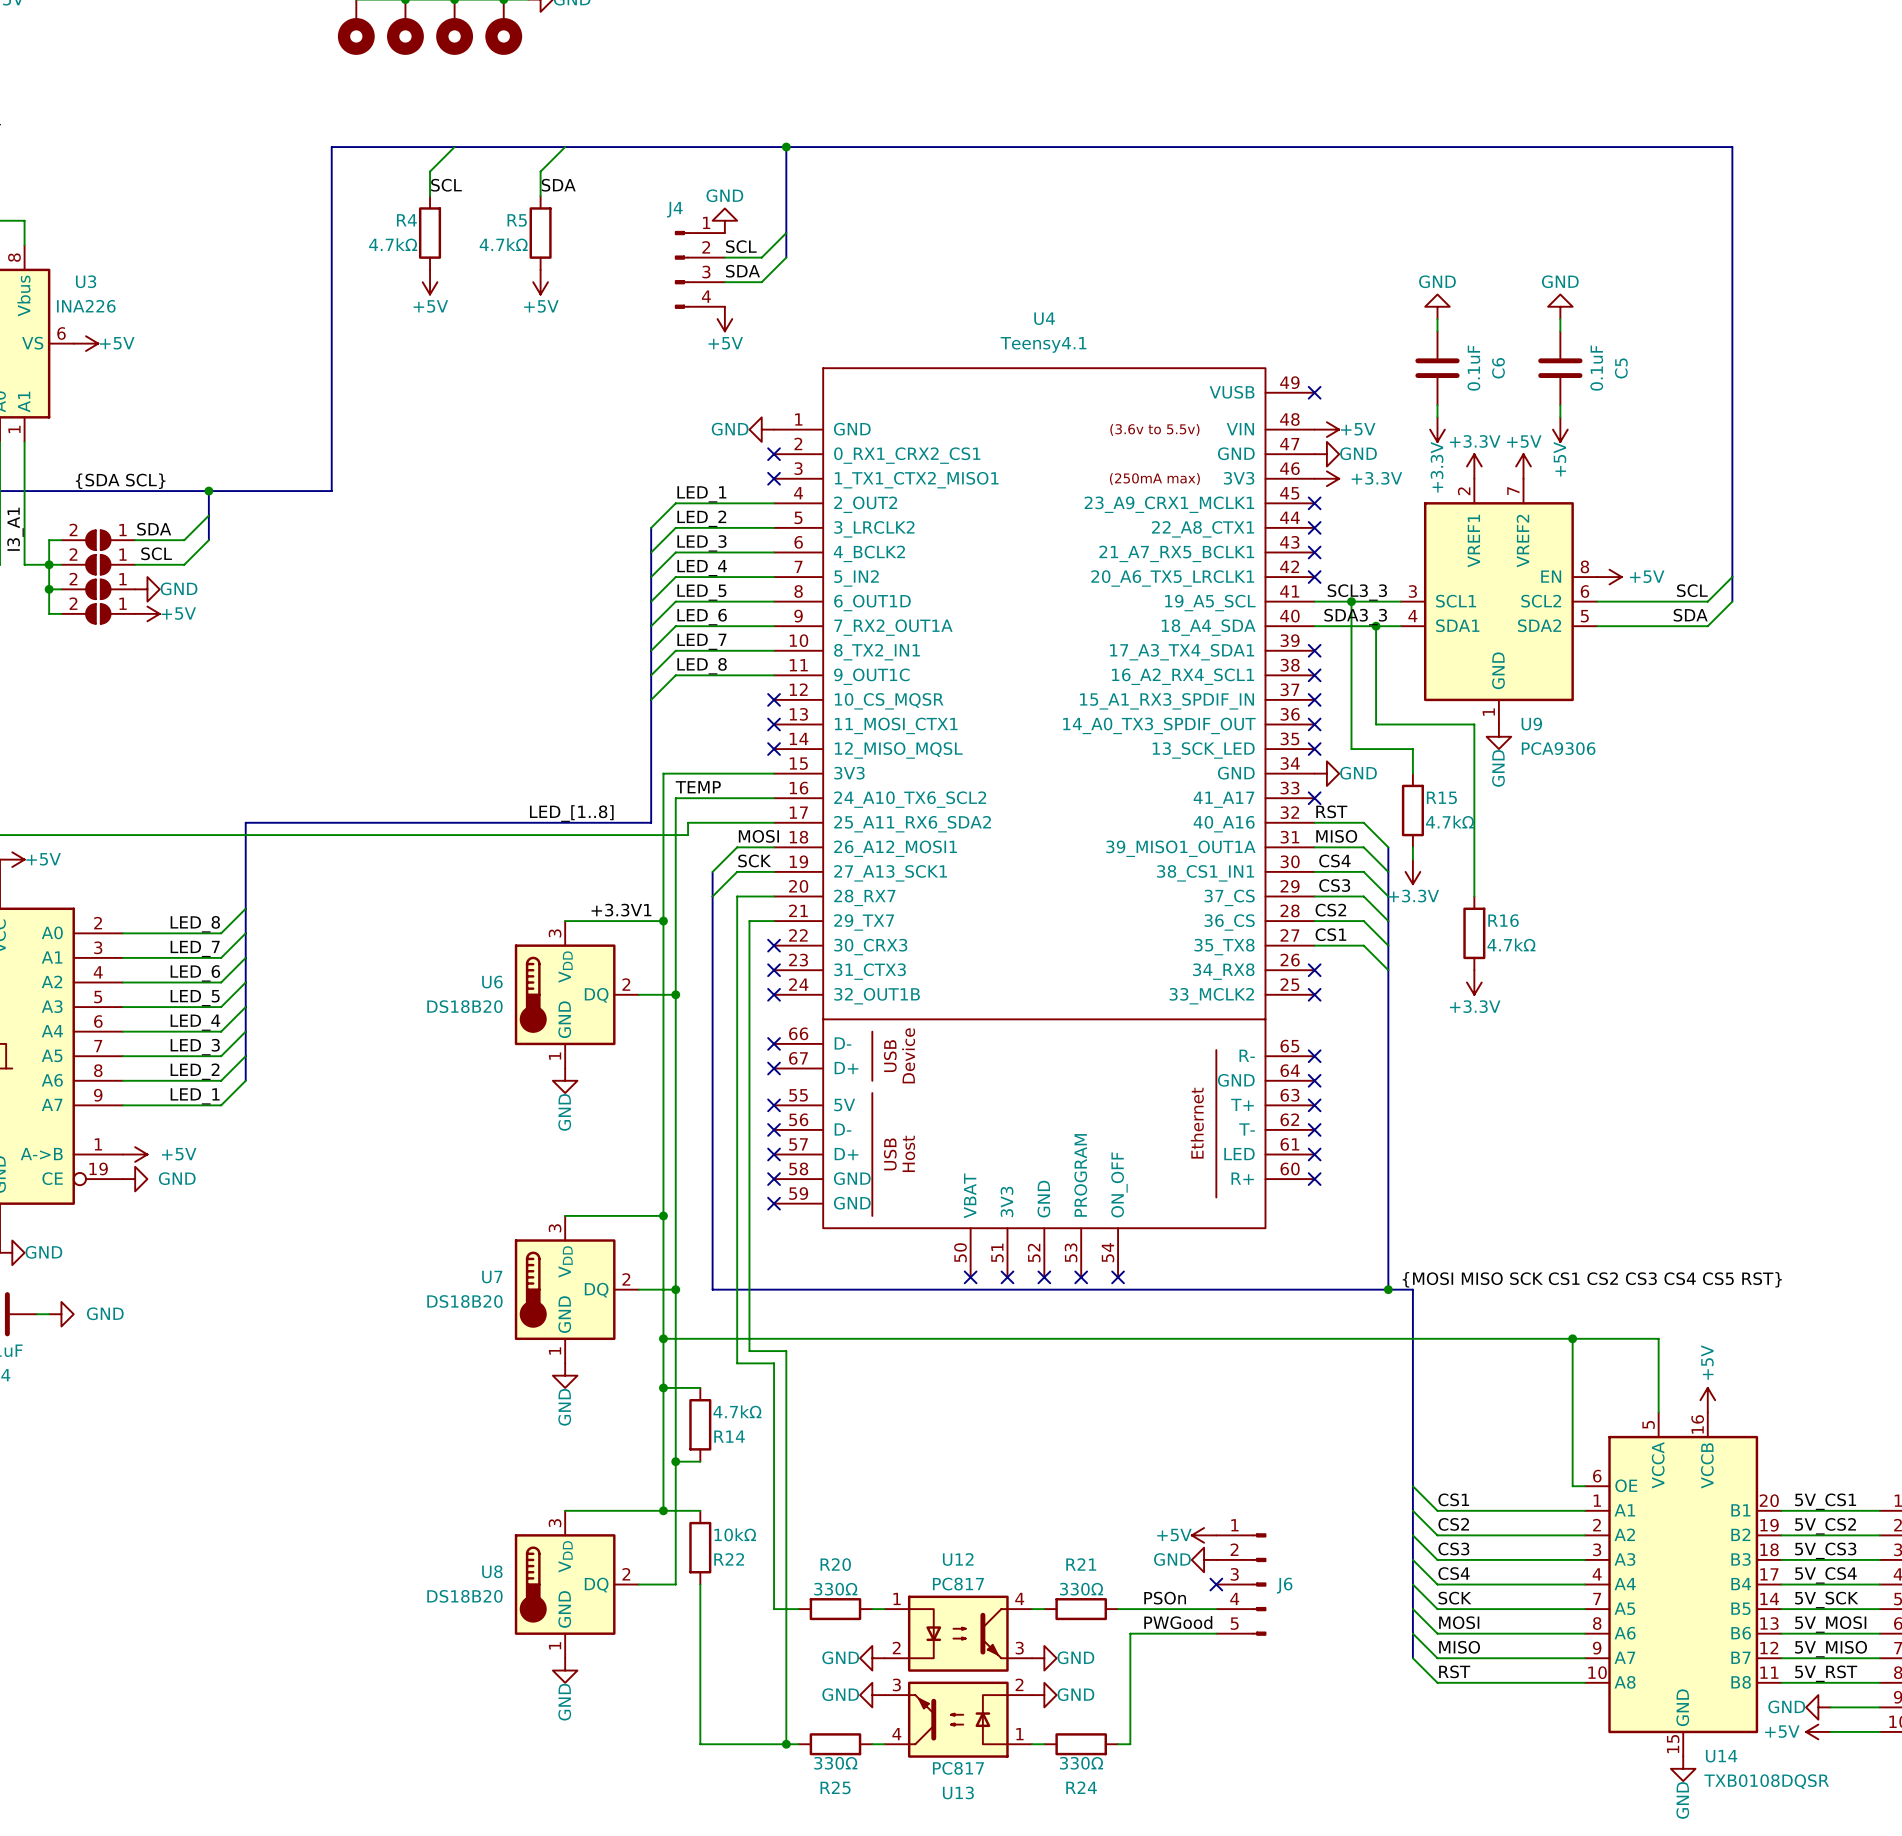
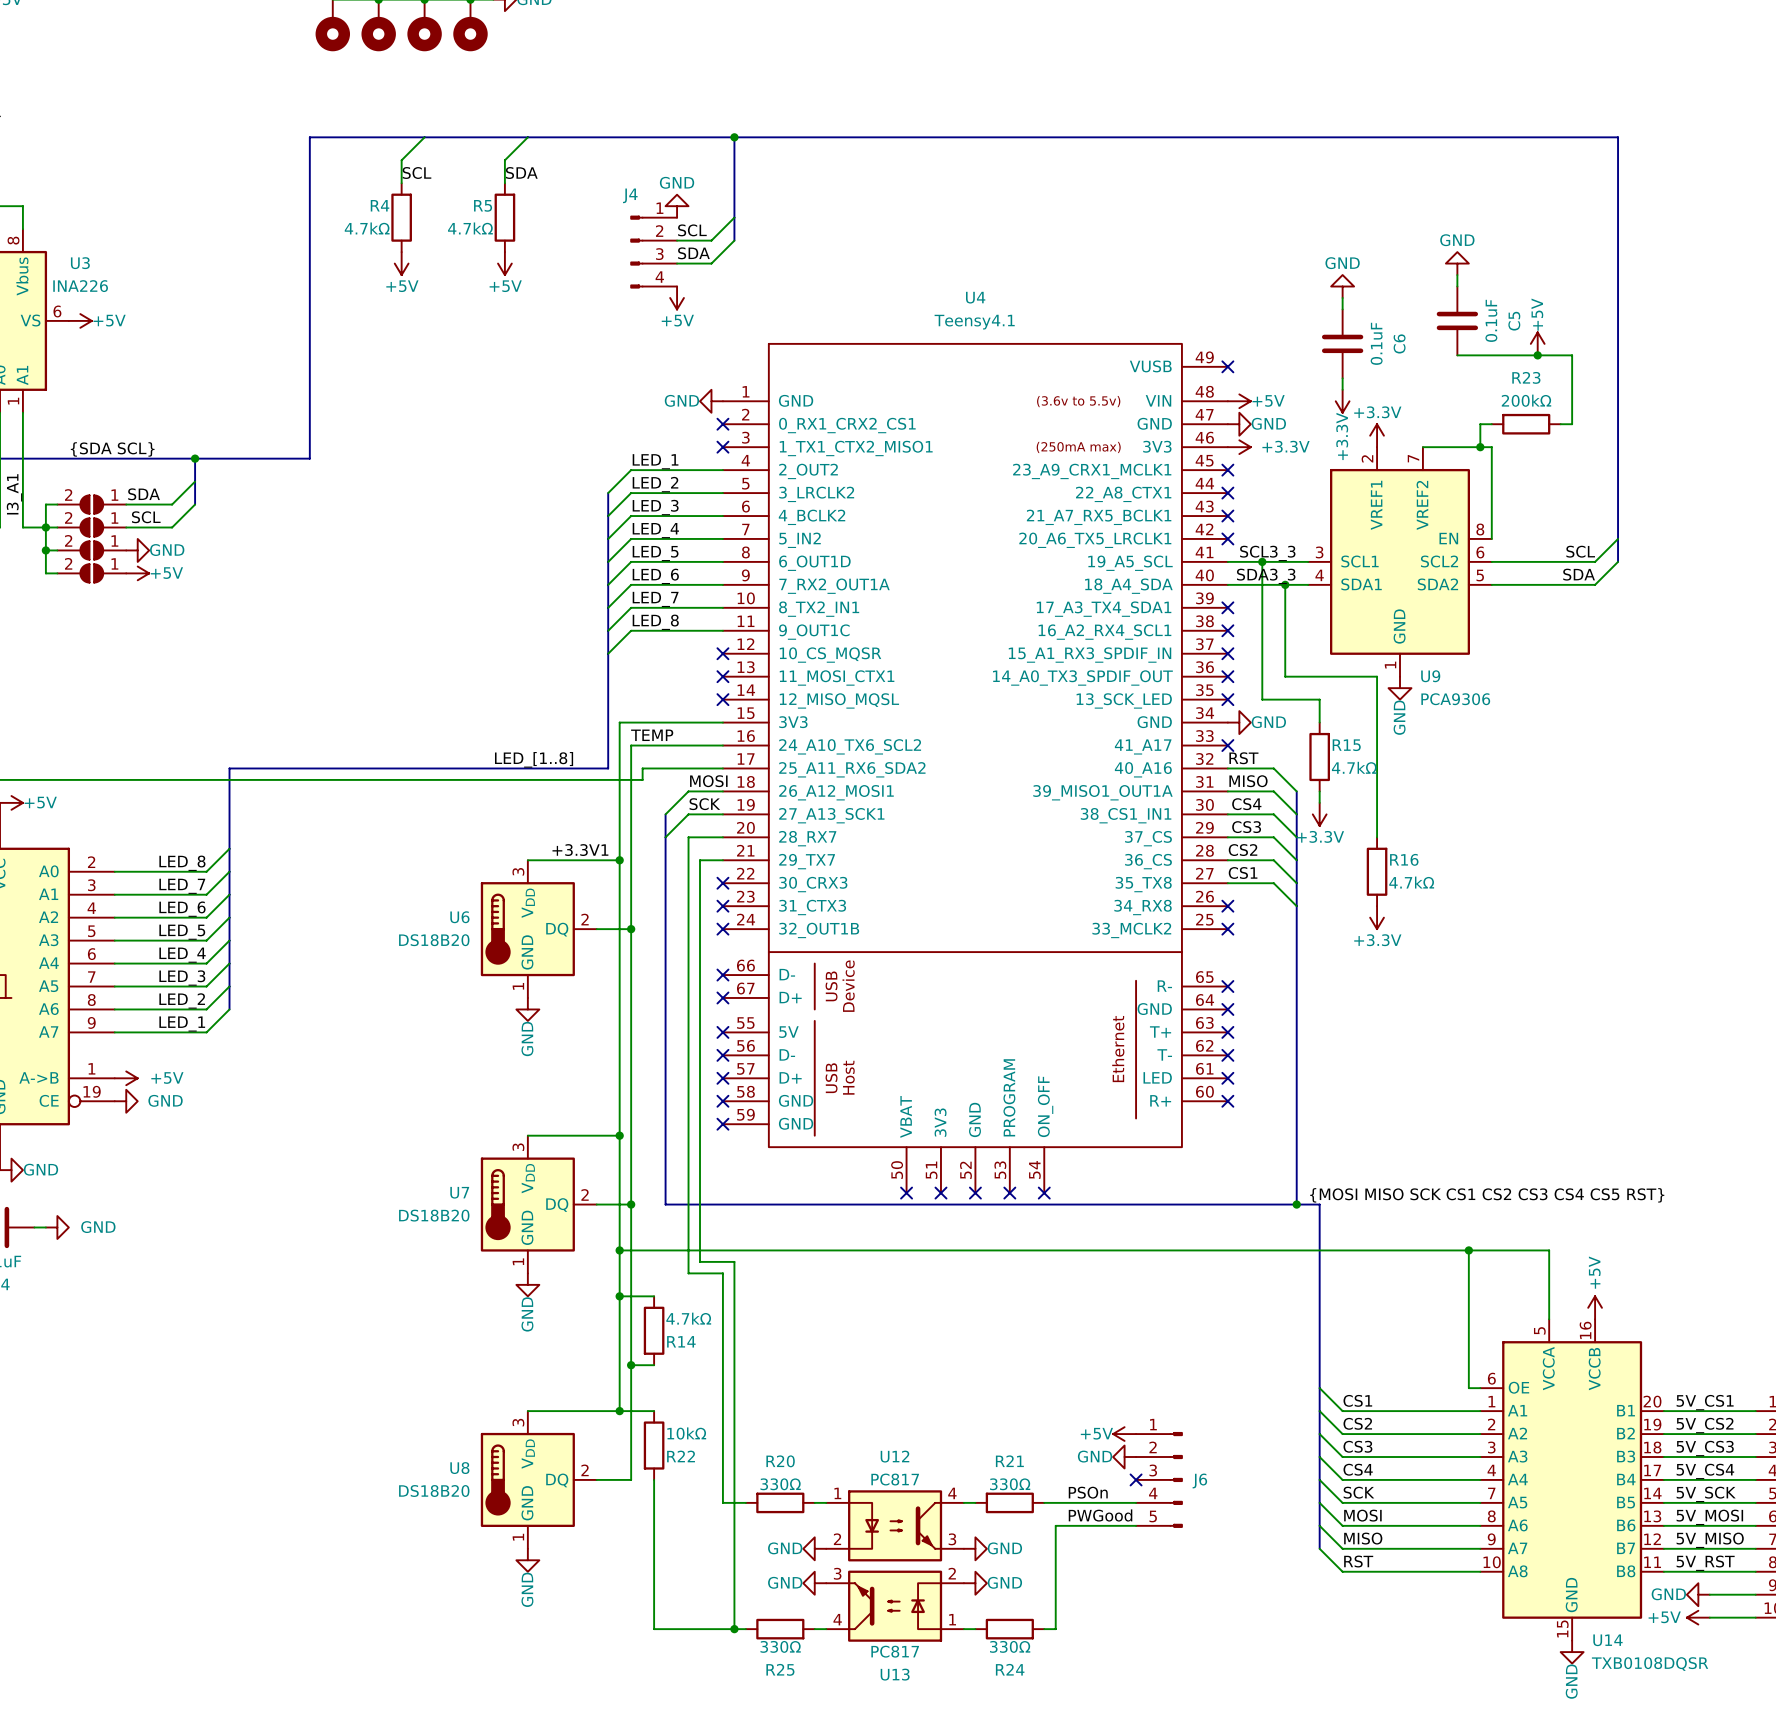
power symbol position: GND (1560, 306) -> GND (1457, 263)
C5 position: (1560, 368) -> (1457, 320)
power symbol: none -> +5V (1537, 343)
wire: none -> (1457, 355) (1572, 355) (1572, 424) (1560, 424)
junction: none -> (1537, 355)
wire: (1560, 405) (1560, 417) -> none
power symbol: +5V (1560, 429) -> none
wire: none -> (1491, 424) (1480, 424) (1480, 447)
R23: none -> 200kΩ (1526, 424)
power symbol: +5V (1523, 466) -> none
wire: none -> (1422, 447) (1491, 447) (1491, 538)
junction: none -> (1480, 447)
power symbol: +5V (1609, 577) -> none

